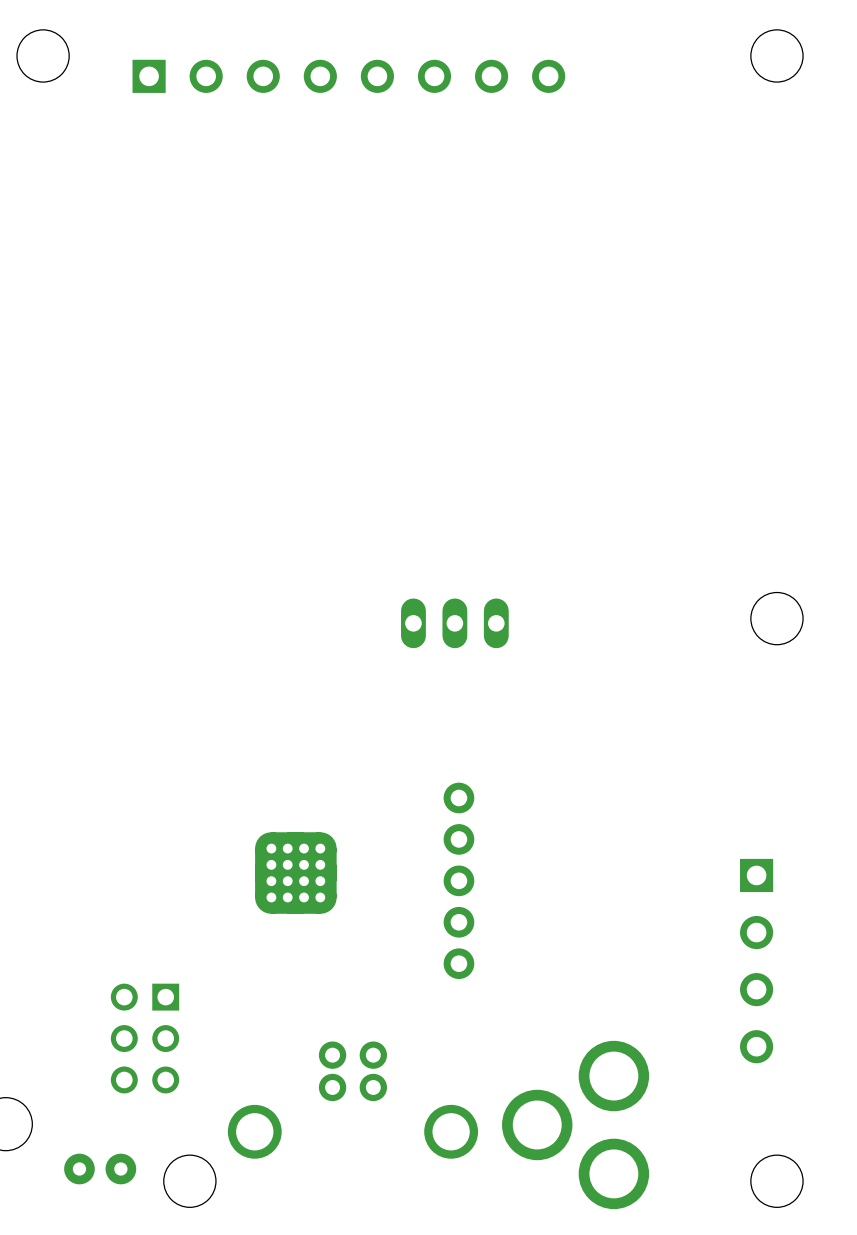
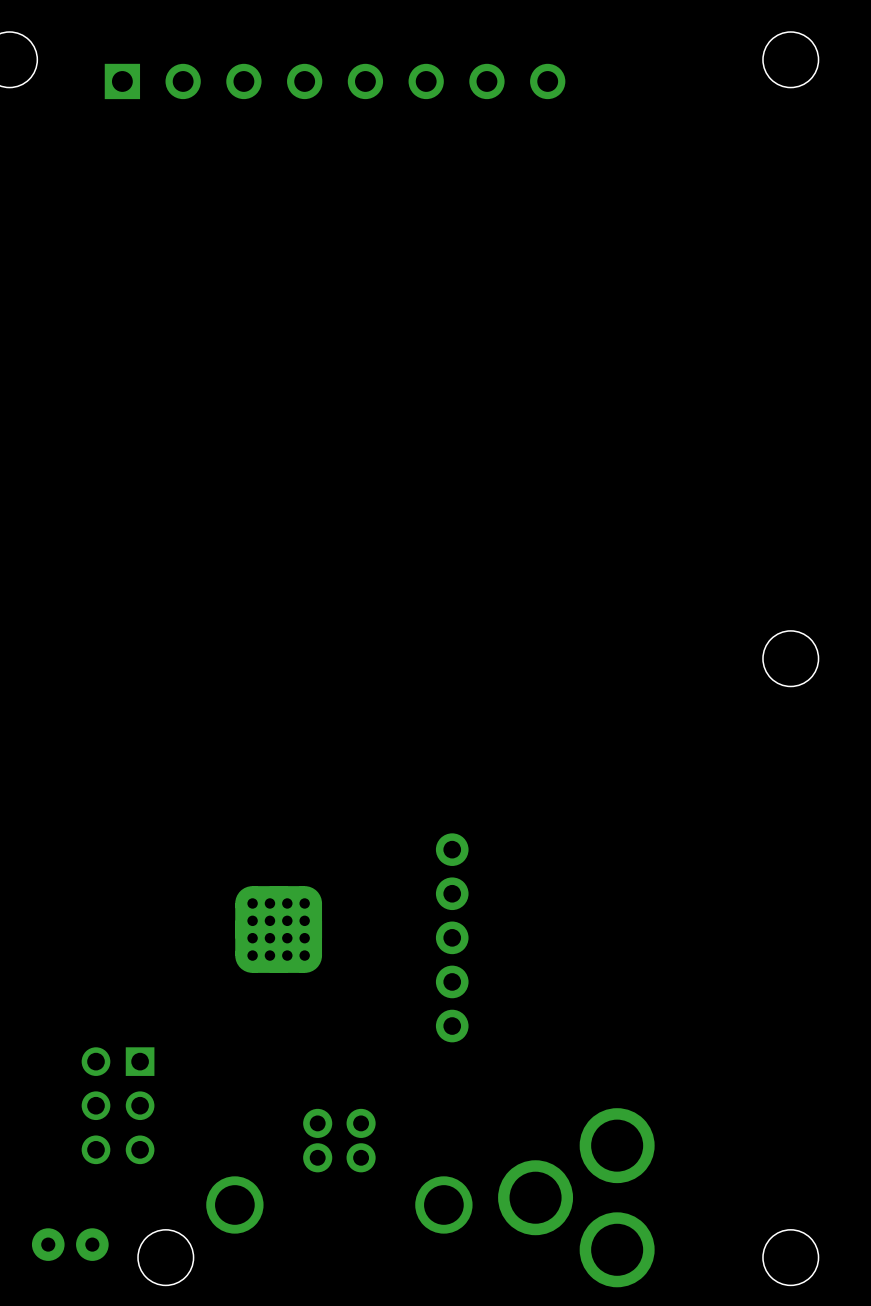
part: (454, 623) -> none
part: (756, 961) -> none

